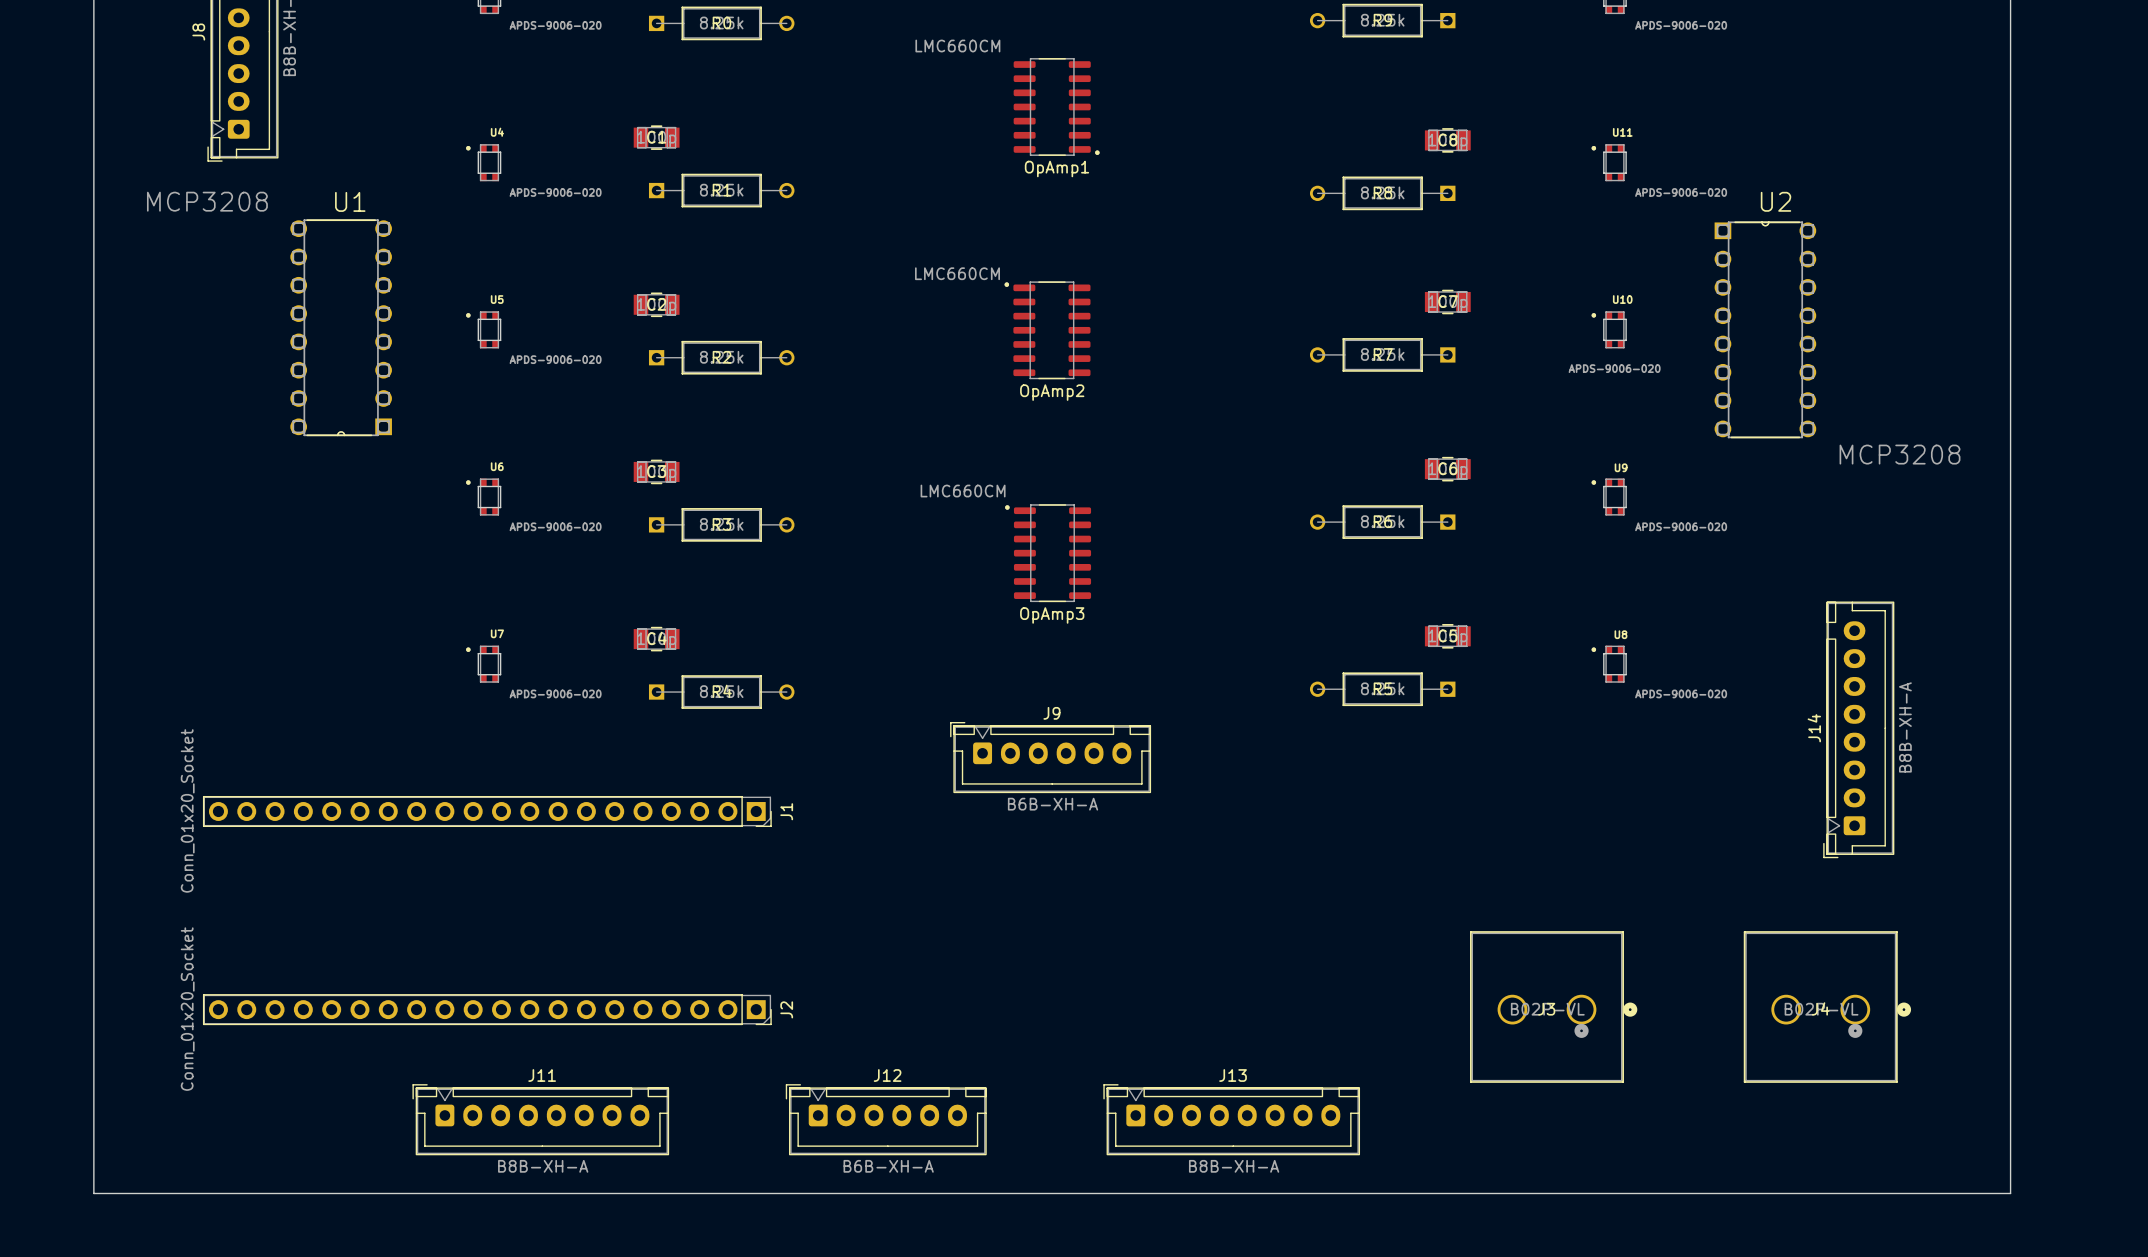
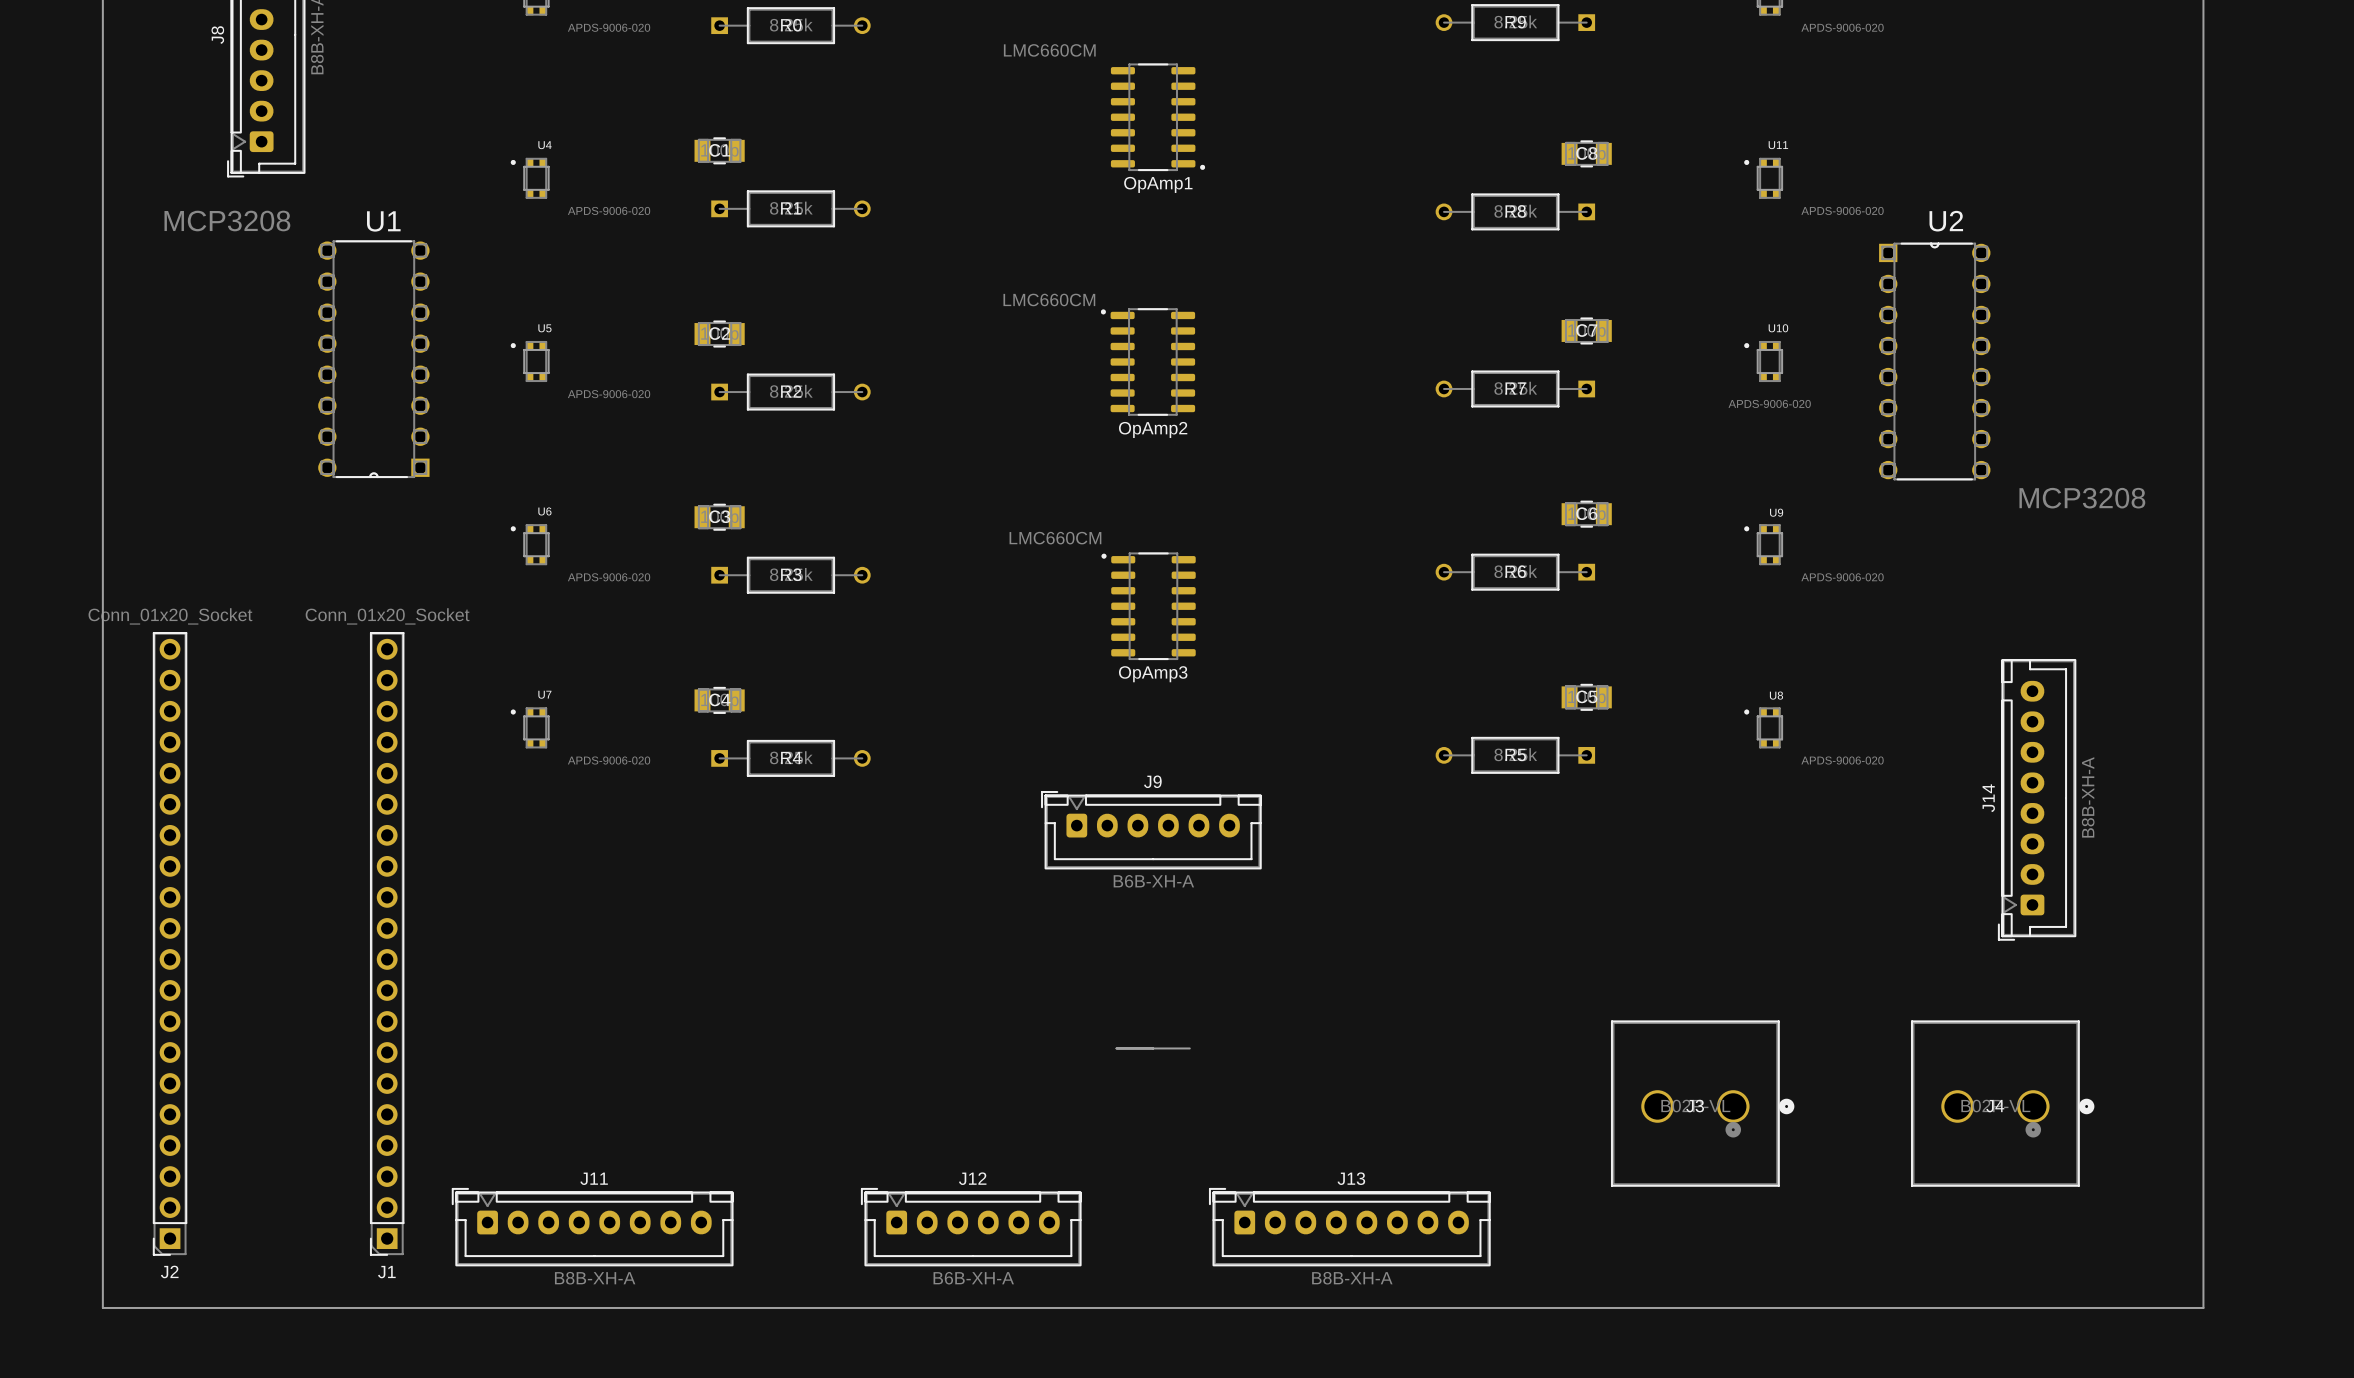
J1 rotation: 0° (487, 811) -> 90° clockwise (387, 943)
board edge: none -> (1116, 1048) (1189, 1048)
J2 rotation: 0° (487, 1009) -> 90° clockwise (170, 943)
J2 position: (487, 1009) -> (170, 943)

